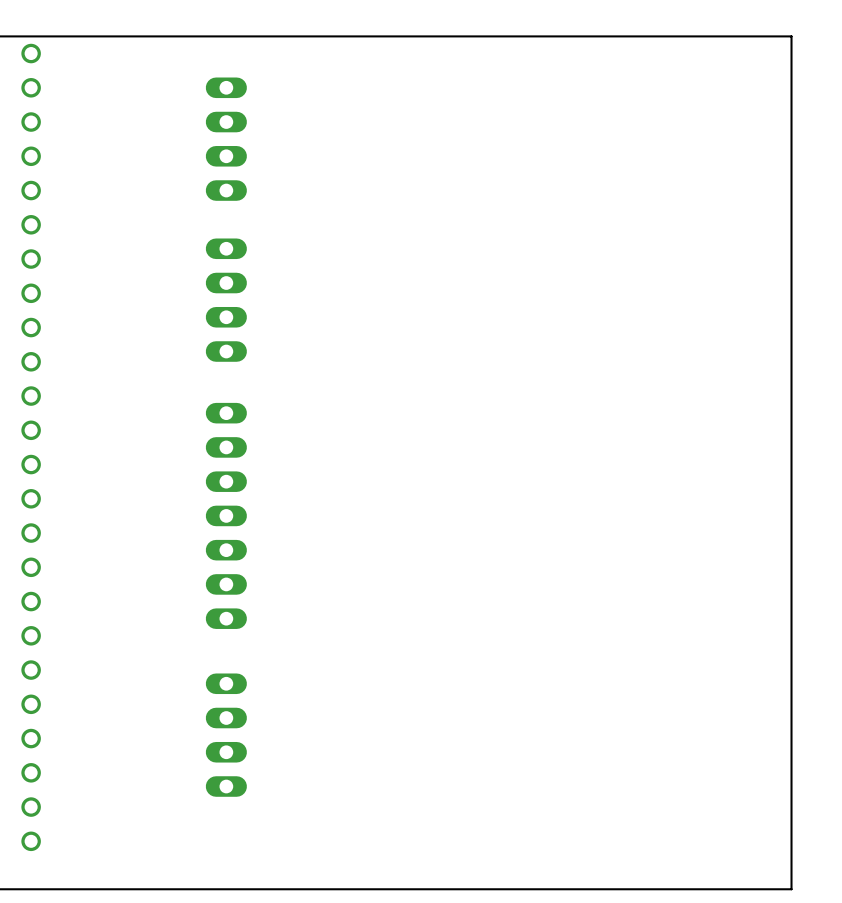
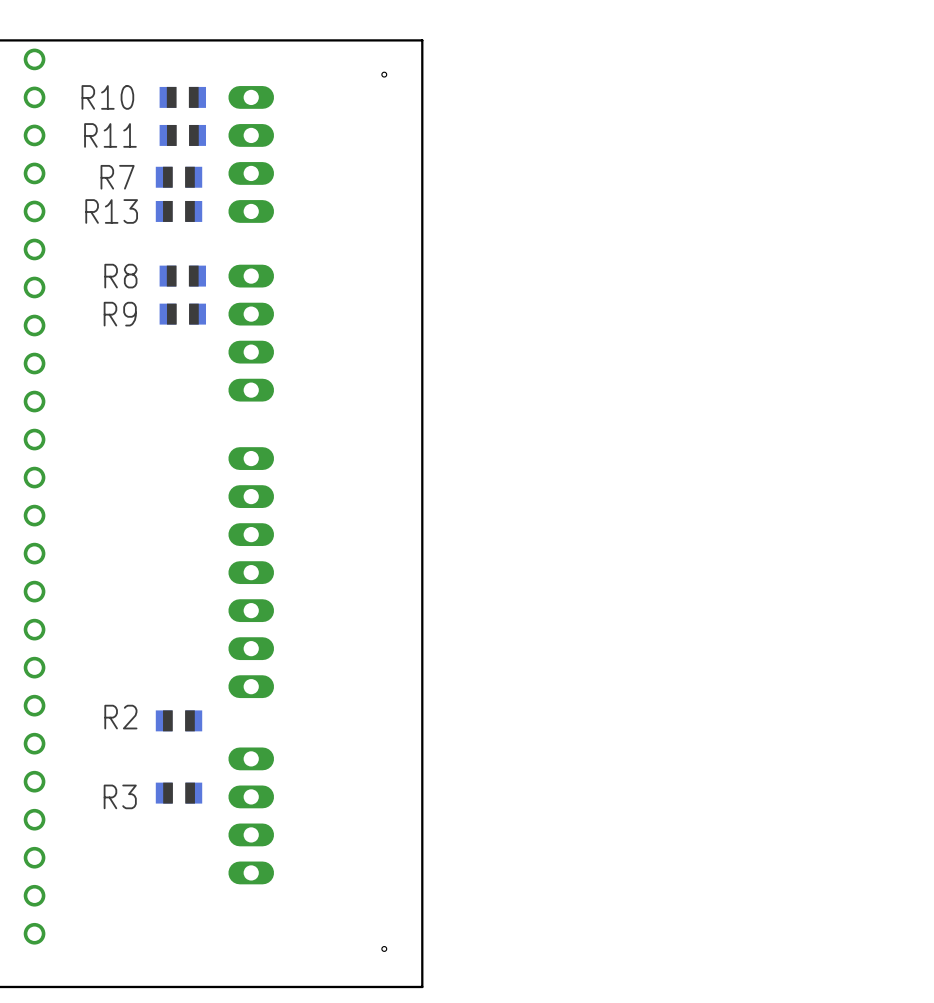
board edge: (380, 36) (791, 36) (791, 889) (380, 889) -> (422, 40) (422, 986)
hole: none -> (384, 74)
R10: none -> (182, 97)
R11: none -> (182, 135)
R7: none -> (179, 177)
R13: none -> (179, 211)
R8: none -> (182, 276)
R9: none -> (182, 314)
R2: none -> (179, 720)
R3: none -> (179, 793)
hole: none -> (384, 948)

